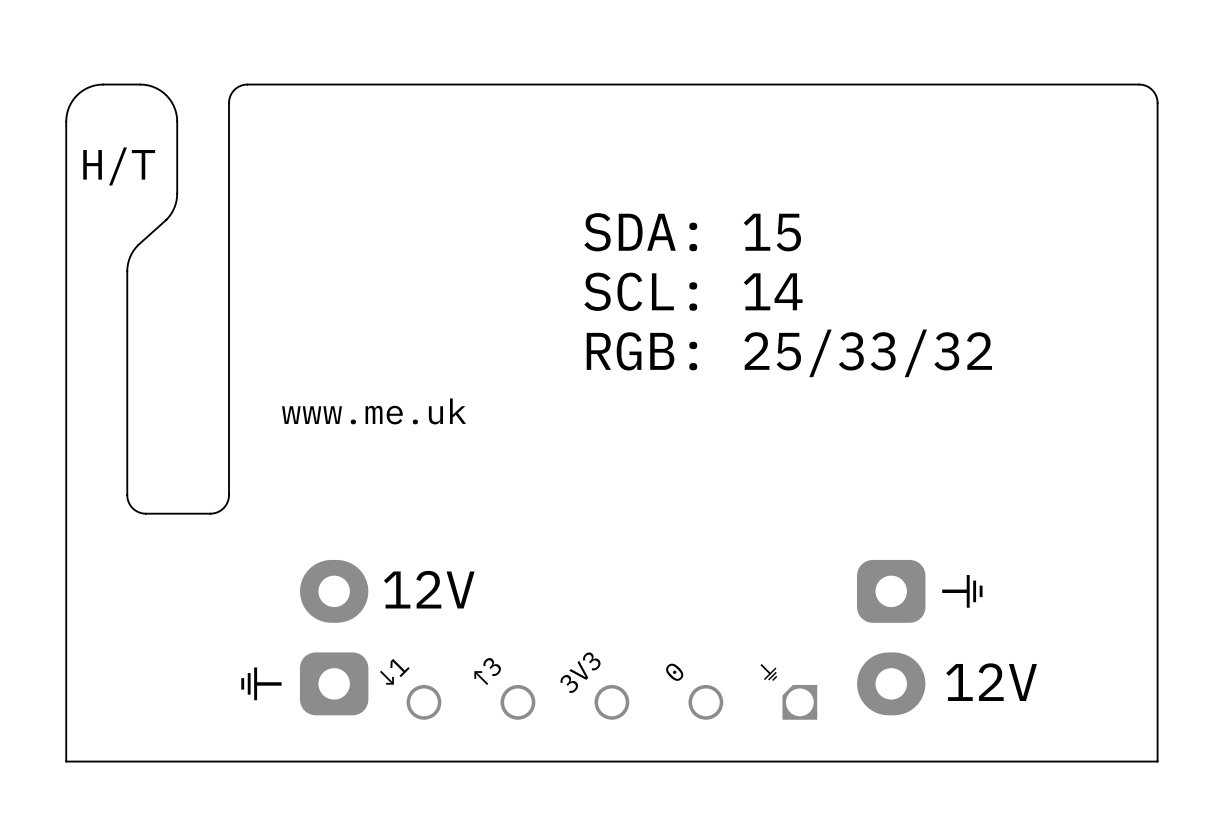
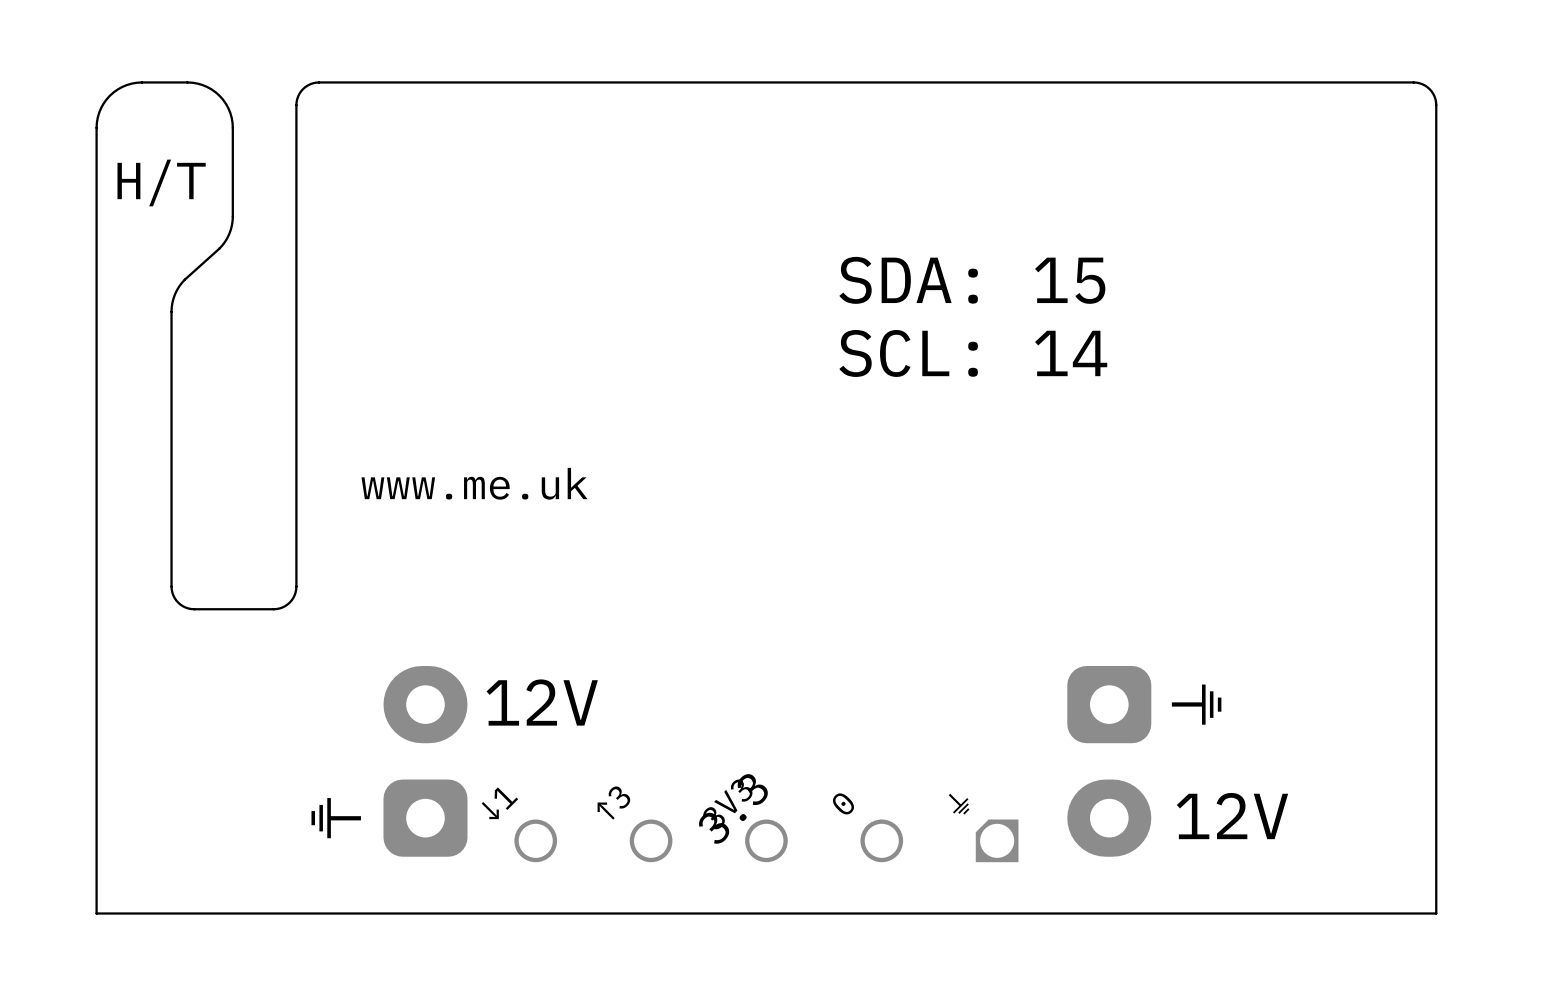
text position: SDA: 15 (692, 232) -> SDA: 15 (972, 280)
text position: SCL: 14 (693, 291) -> SCL: 14 (973, 353)
text: RGB: 25/33/32 (789, 353) -> none
part text: none -> 3.3 (733, 808)

